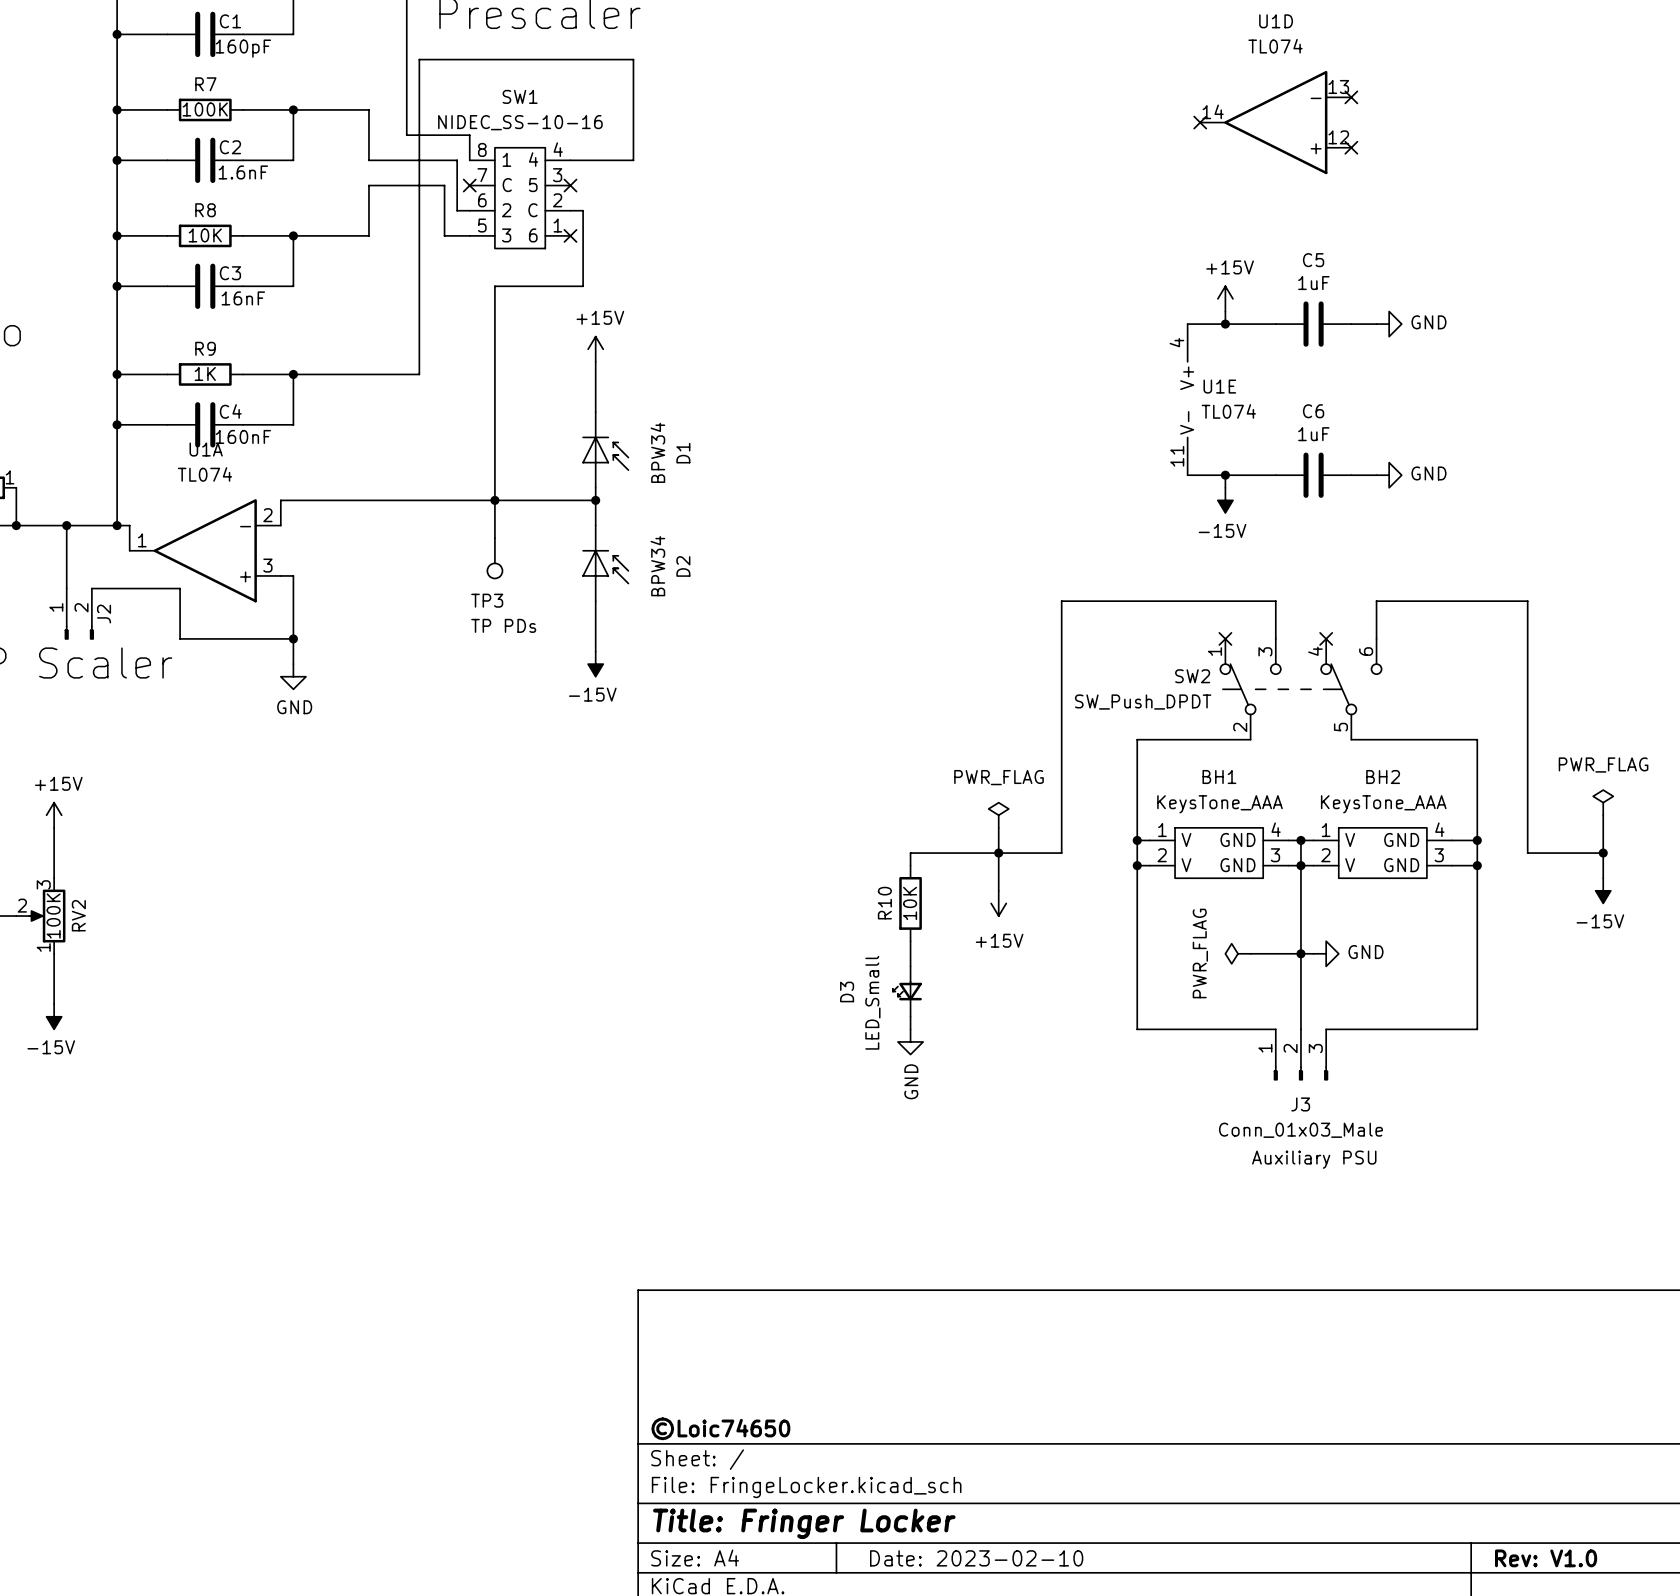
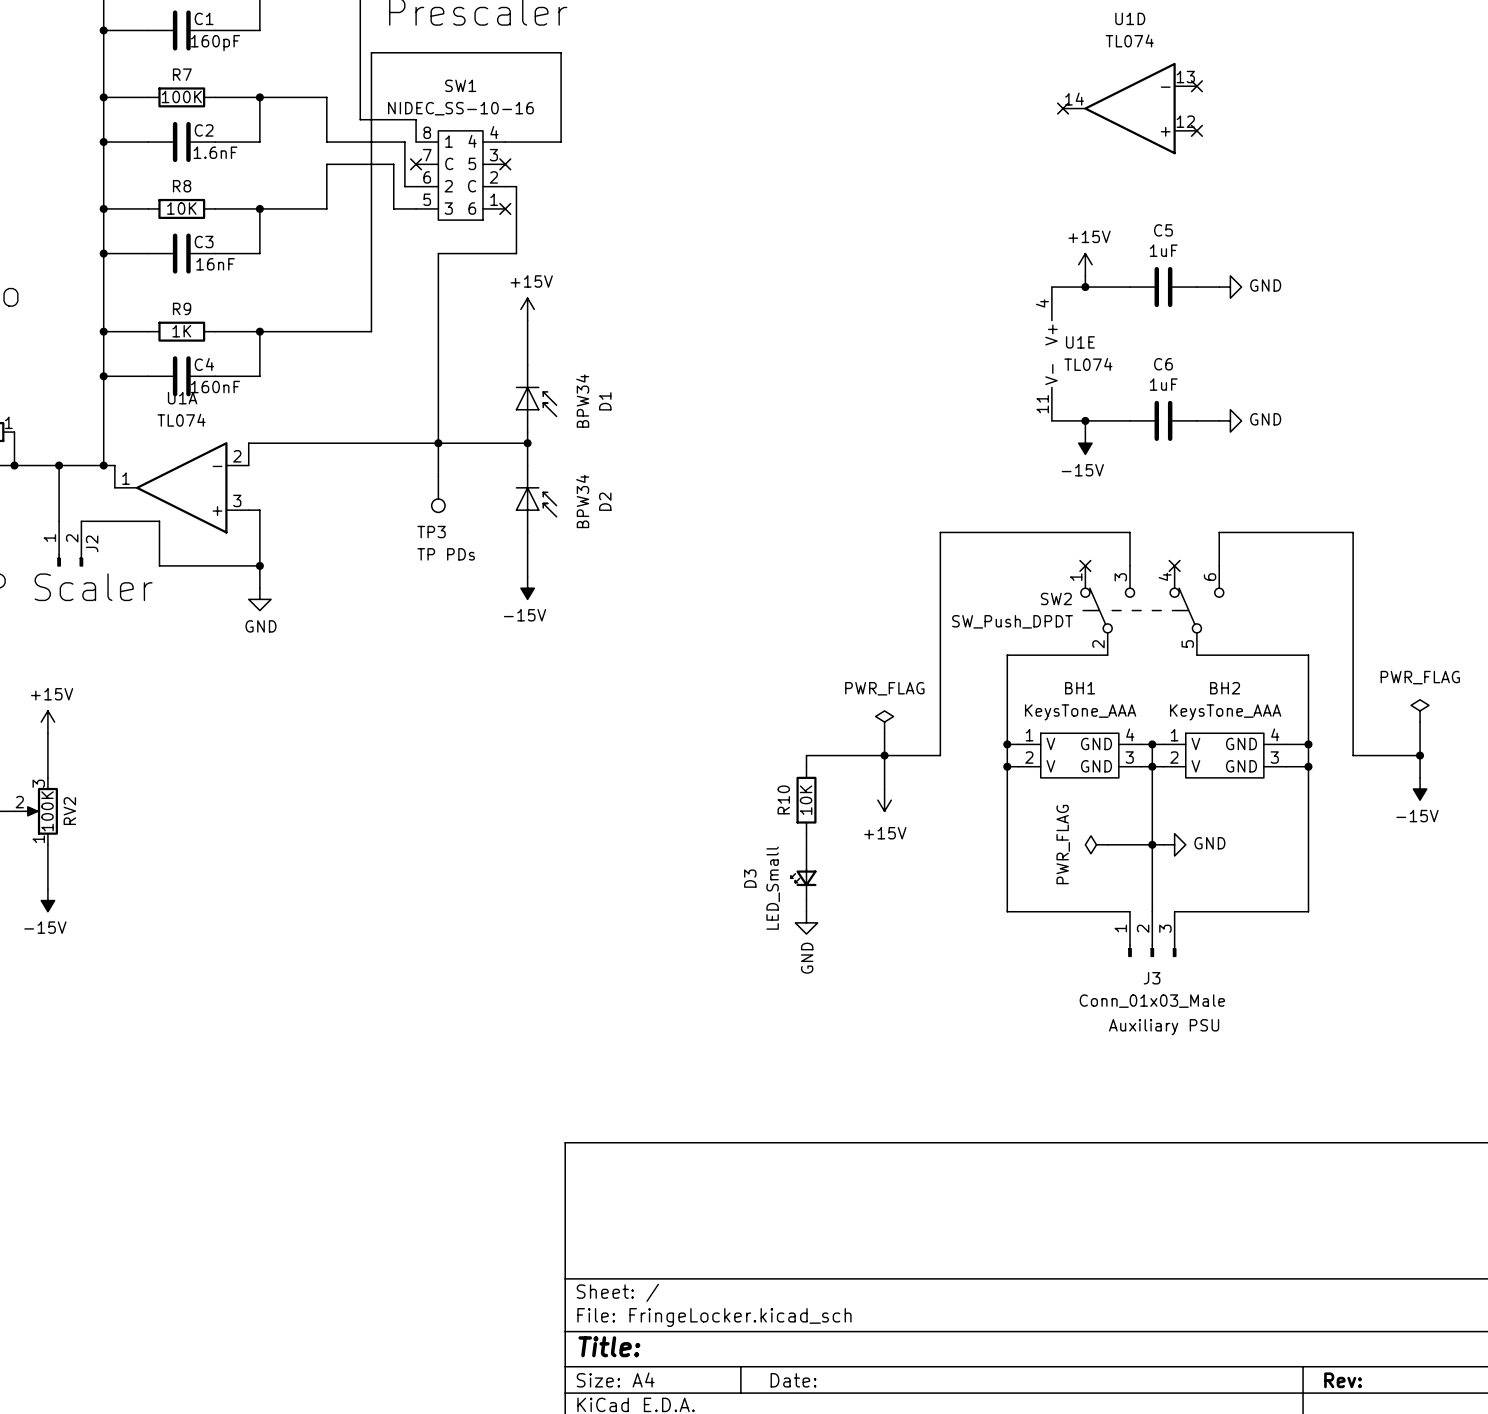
title block: ©Loic74650 (720, 1428) -> none
title block: Title: Fringer Locker (804, 1523) -> Title: (609, 1346)
title block: Date: 2023-02-10 (976, 1558) -> Date: (793, 1380)
title block: Rev: V1.0 (1546, 1558) -> Rev: (1343, 1380)

